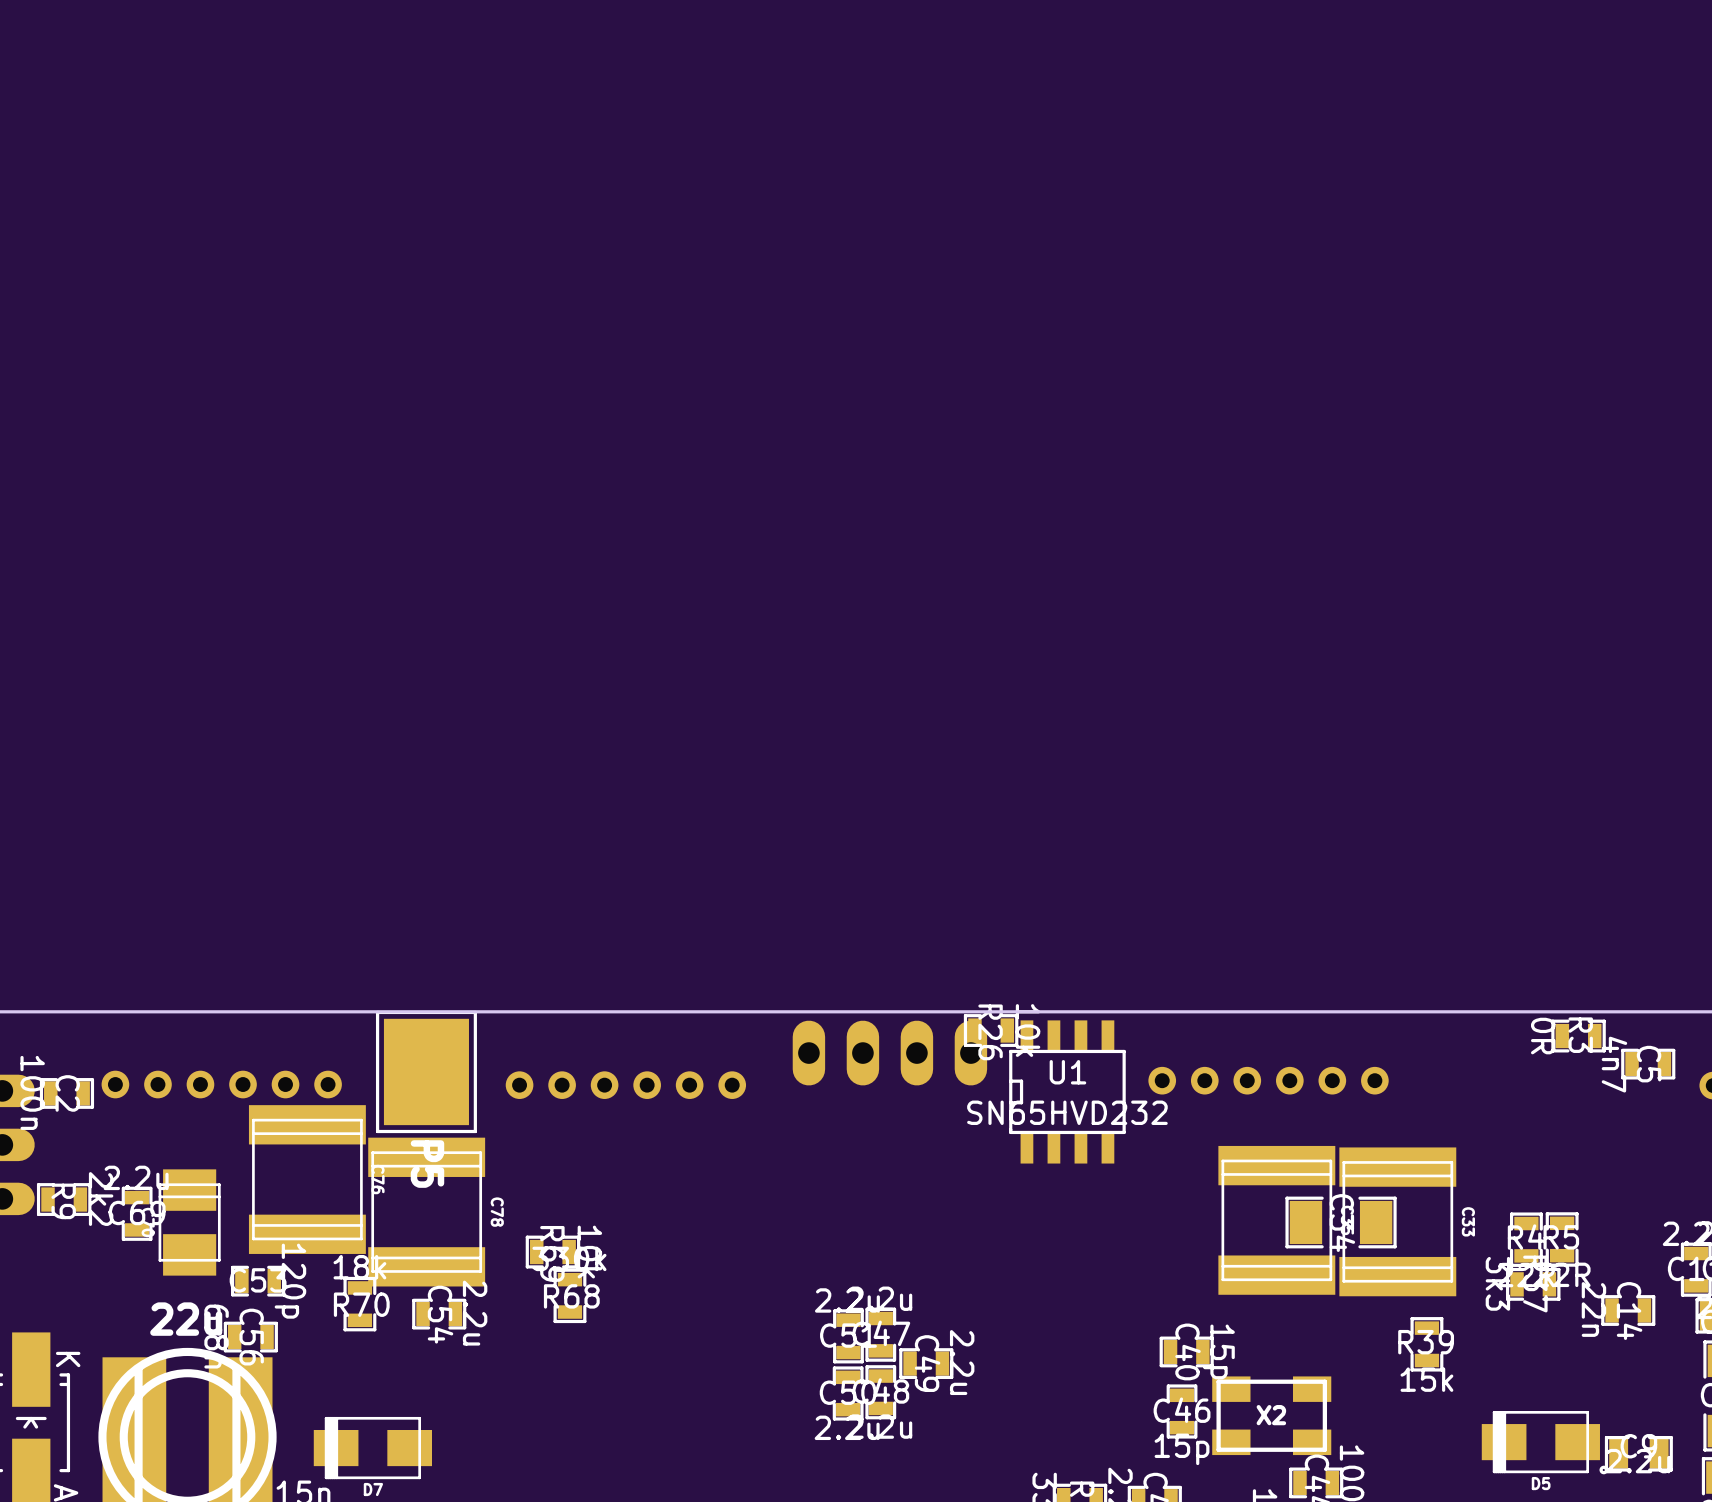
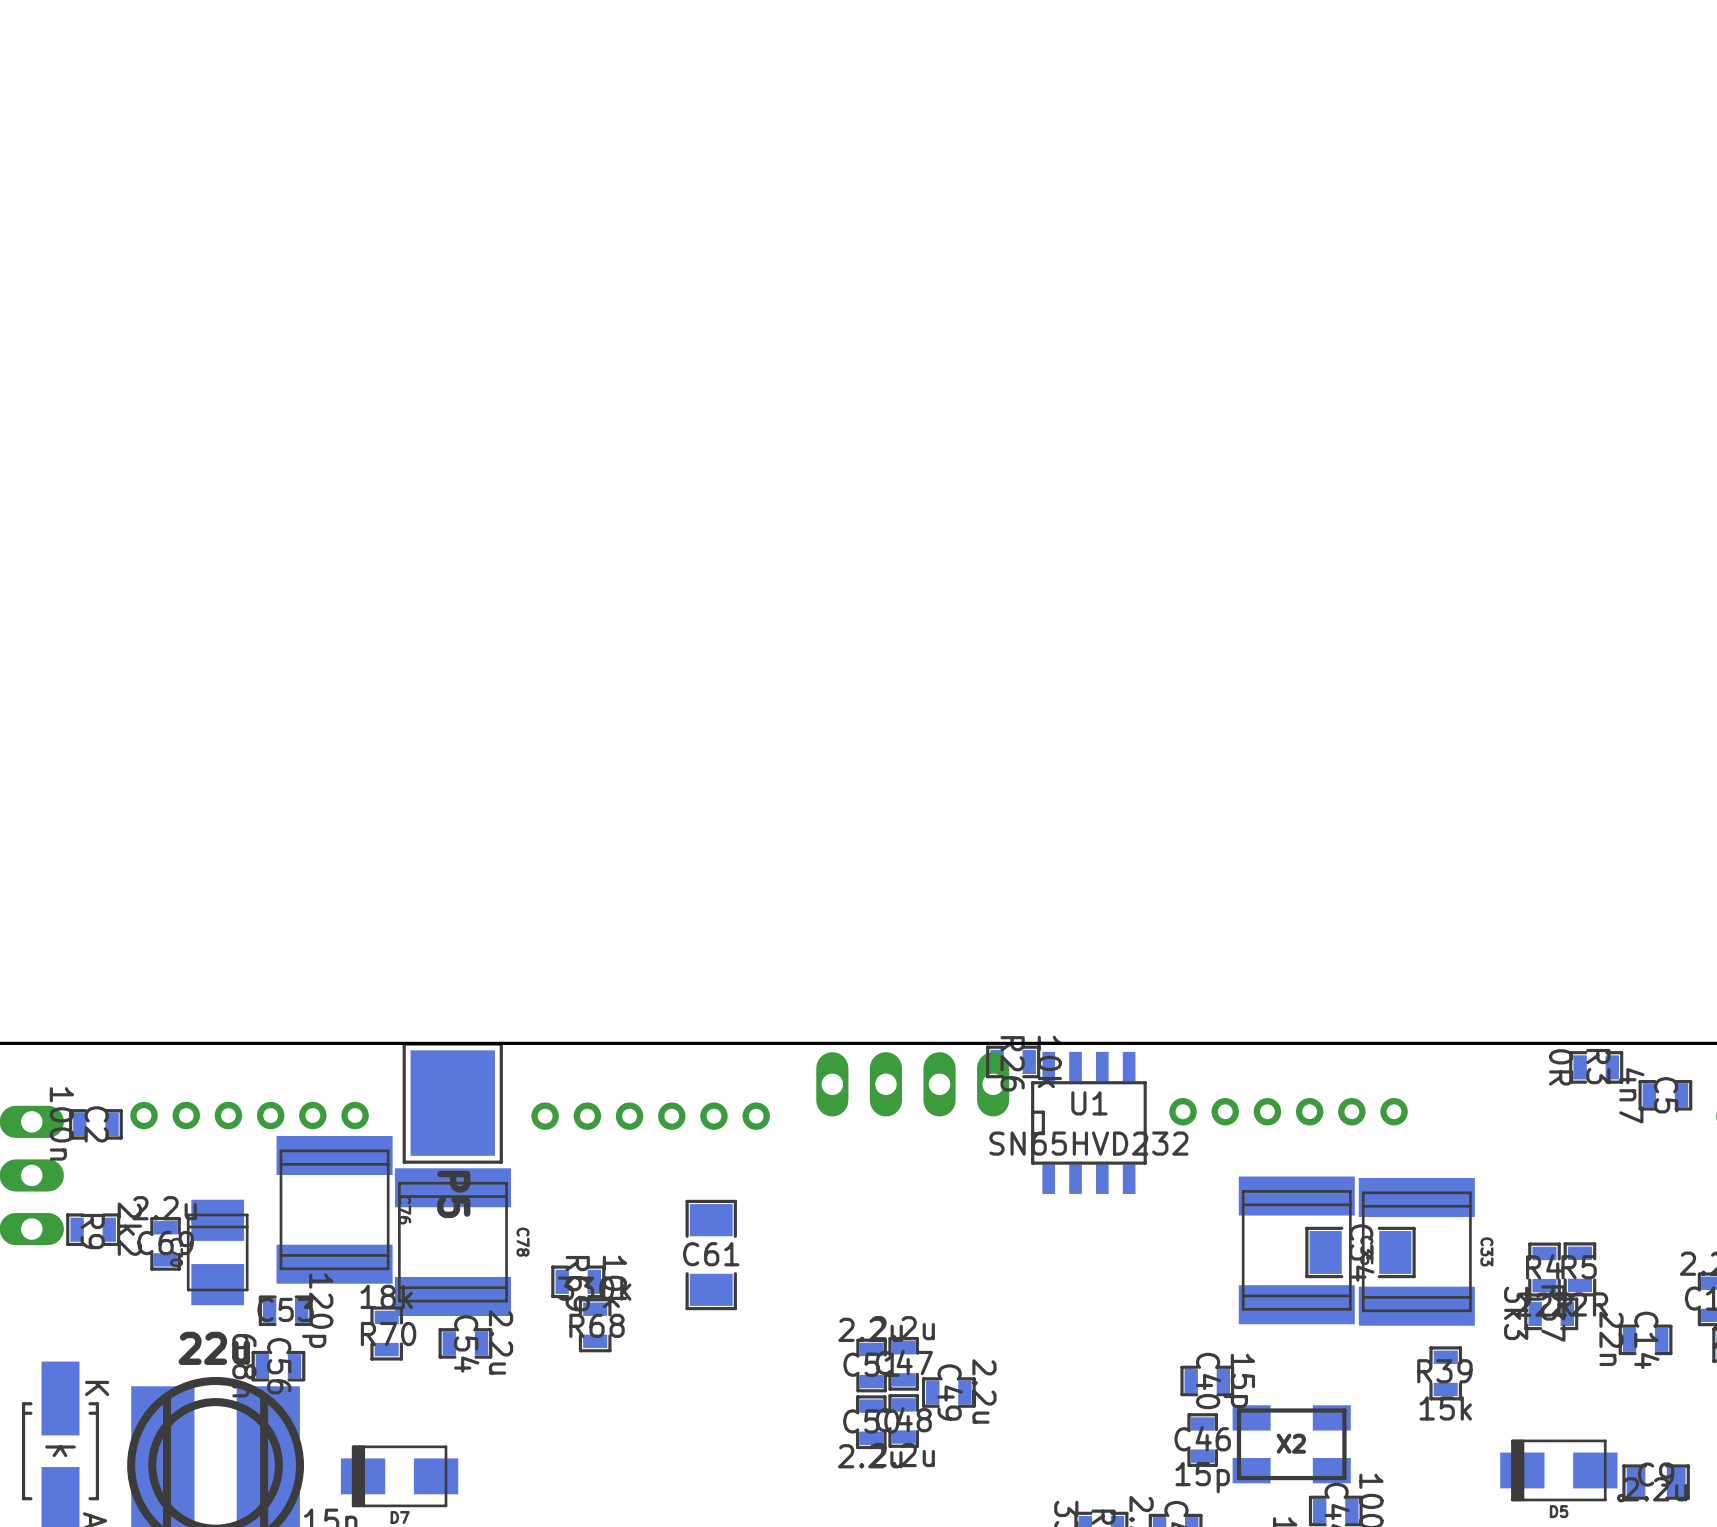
C61: none -> (711, 1255)

